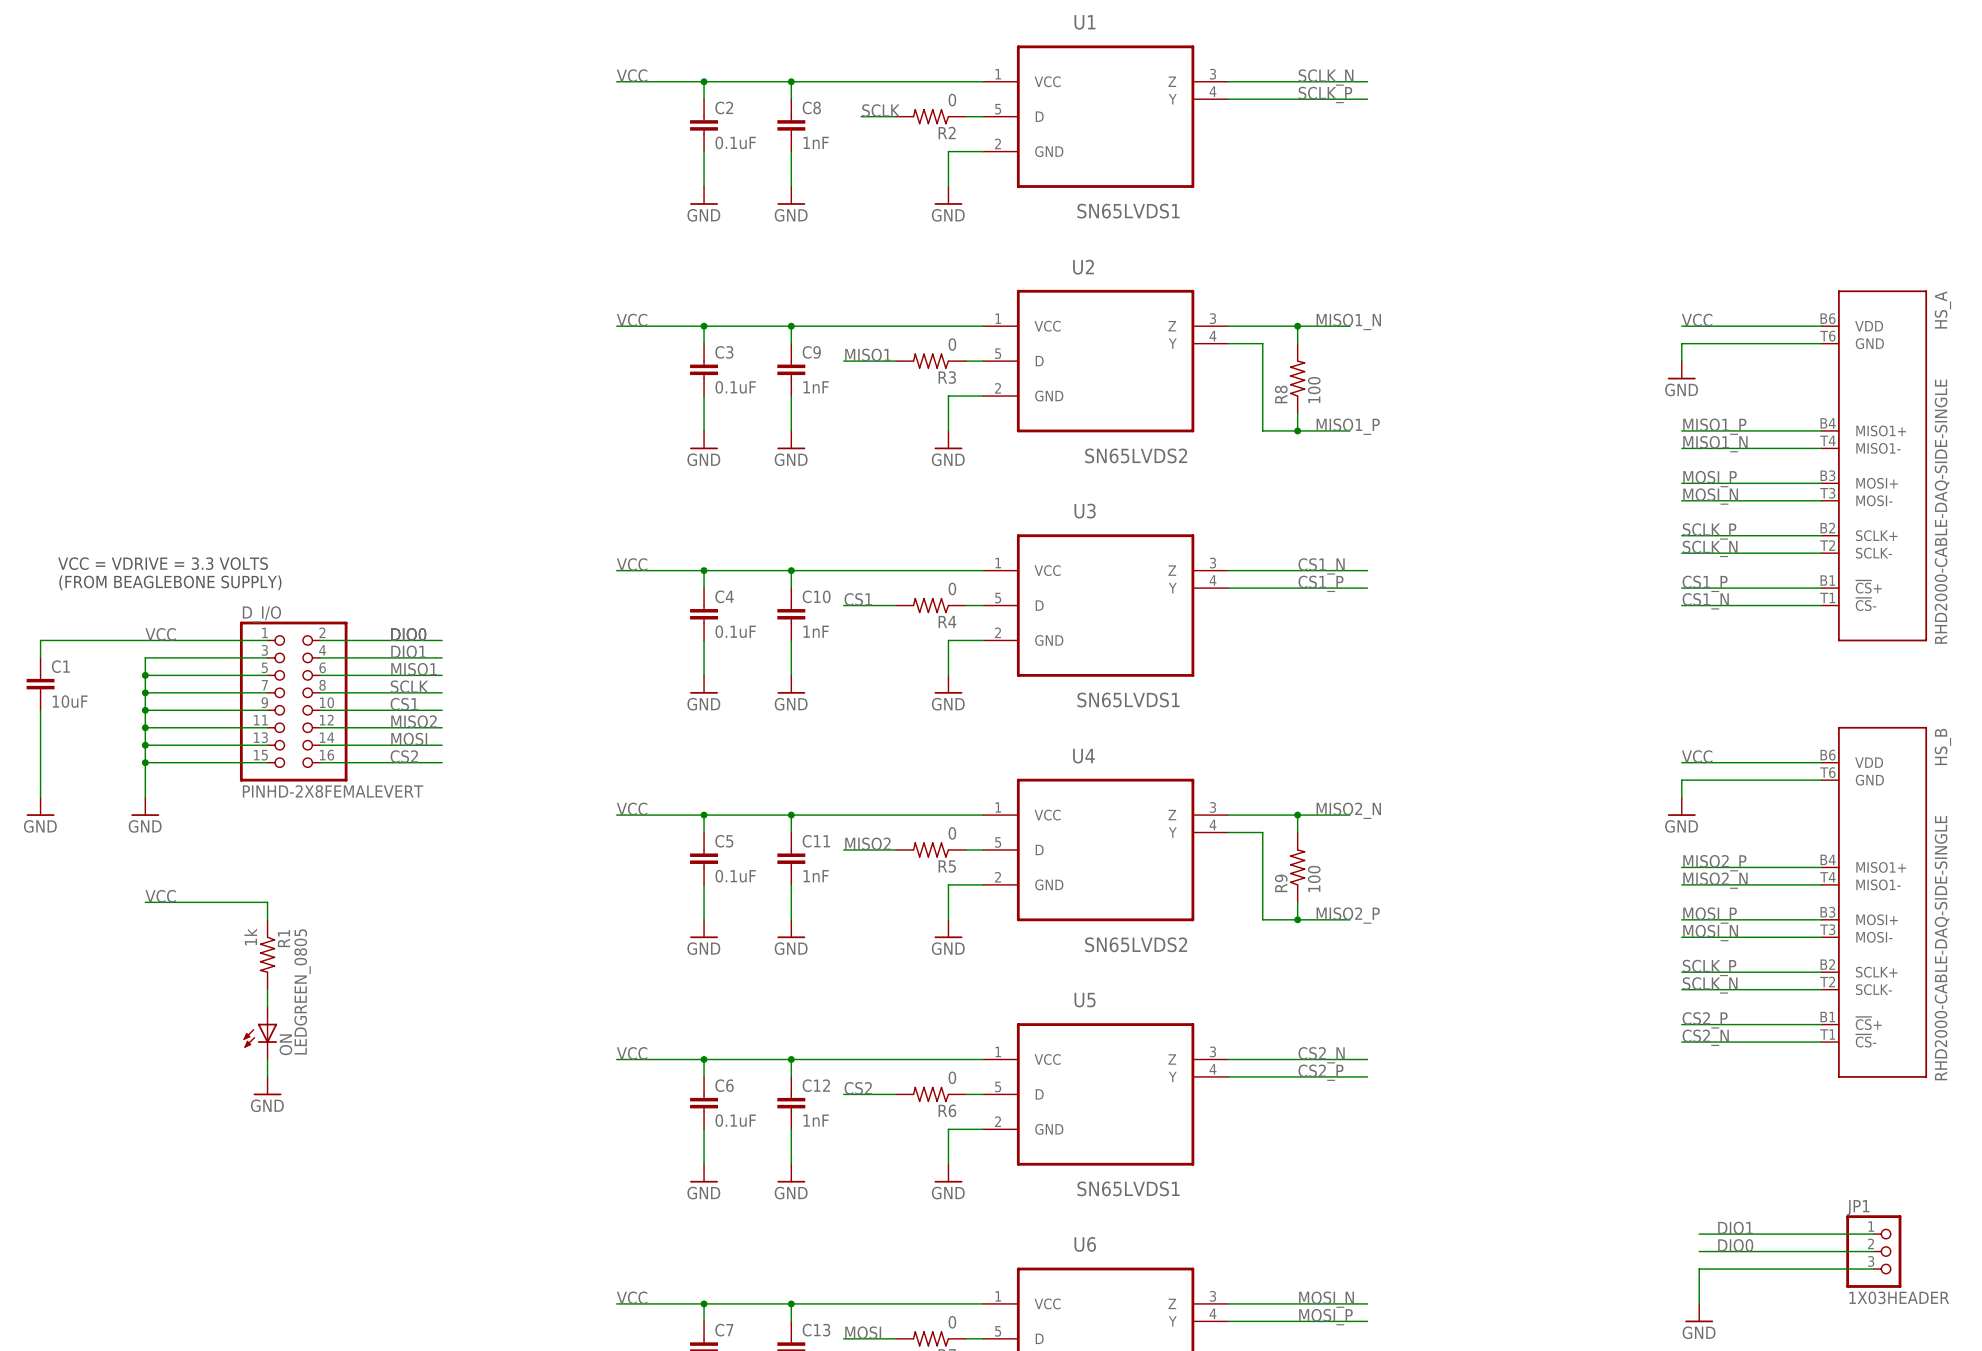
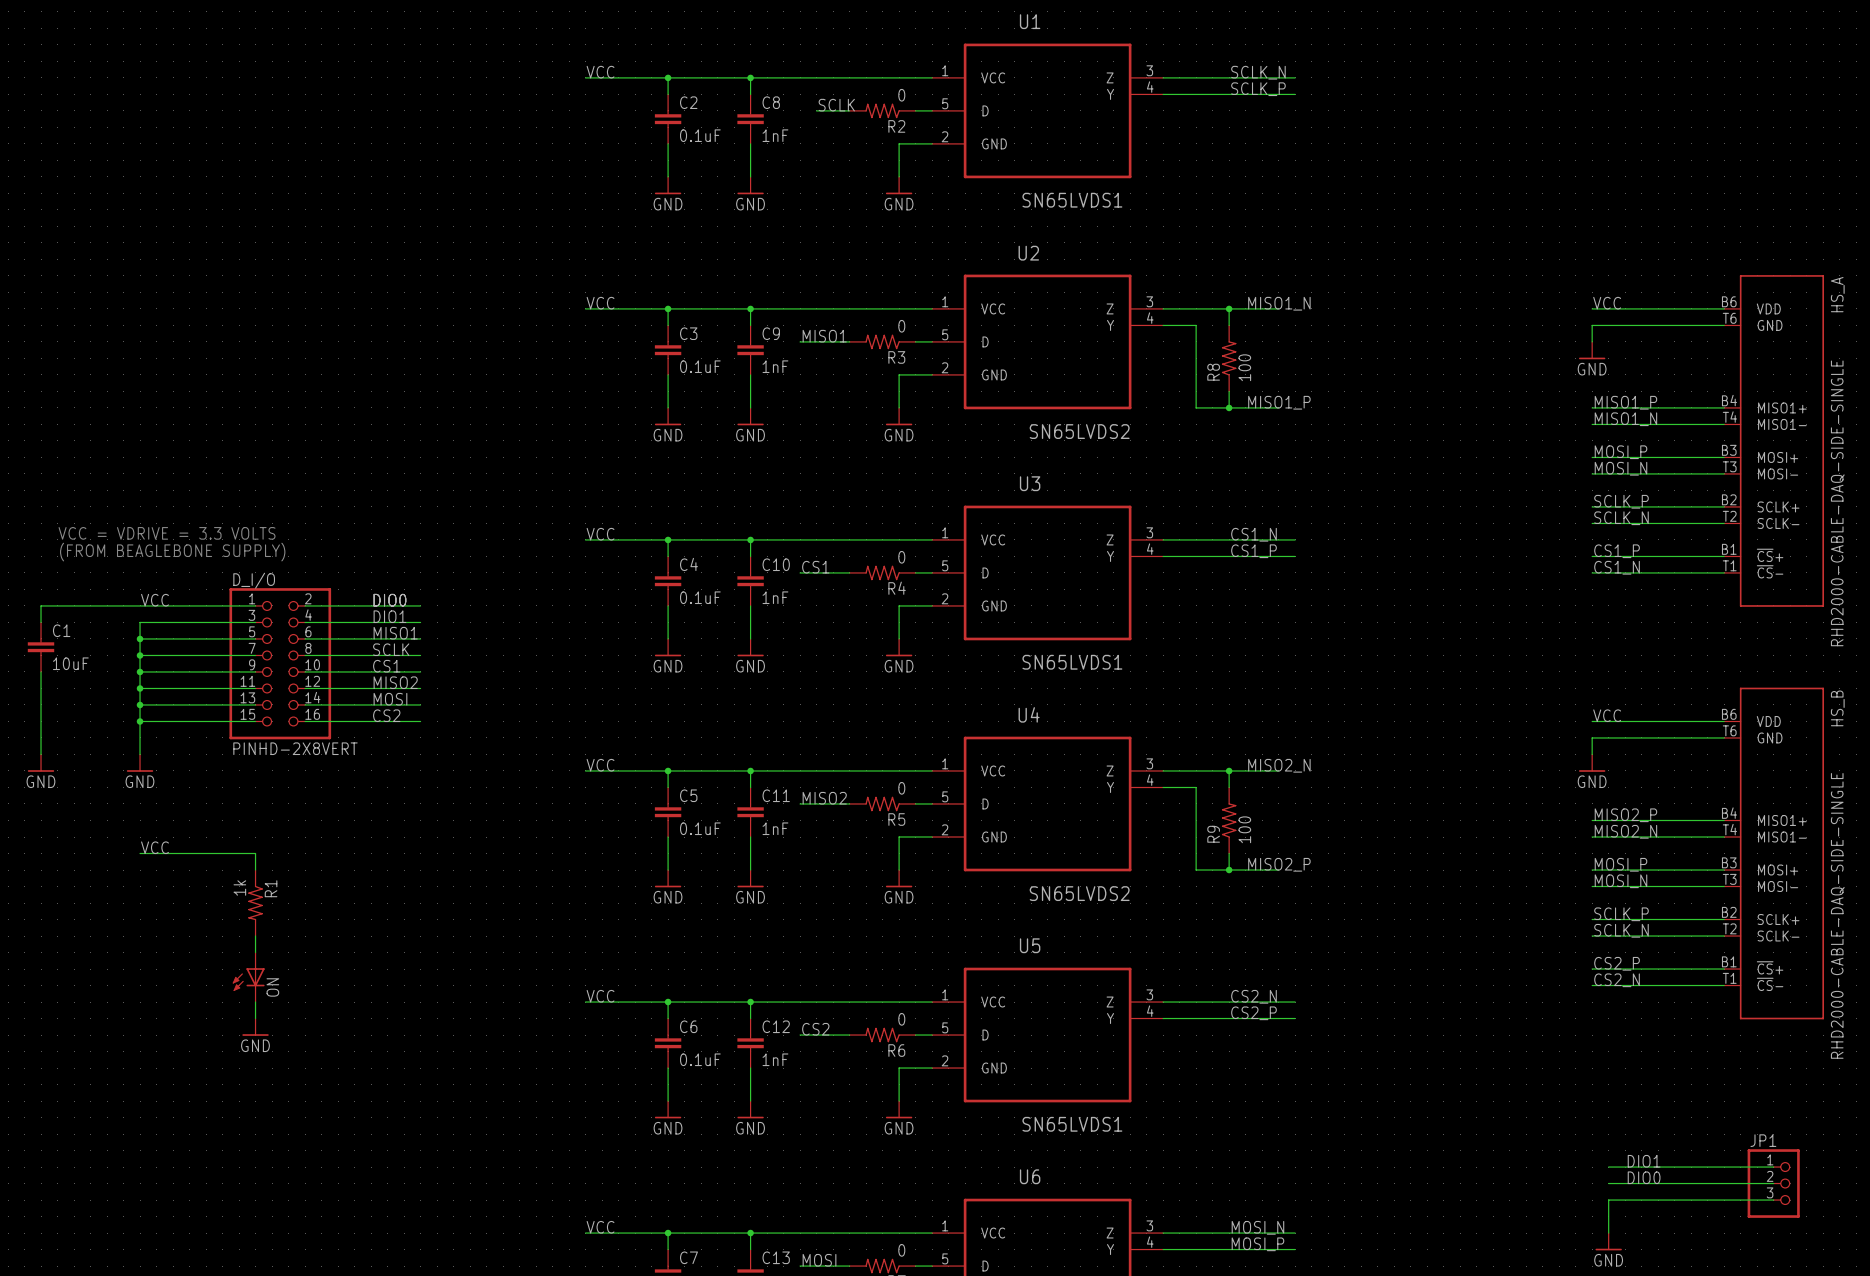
D_I/O value: PINHD-2X8FEMALEVERT (333, 791) -> PINHD-2X8VERT (295, 748)
ON value: LEDGREEN_0805 (302, 991) -> none
JP1 value: 1X03HEADER (1899, 1297) -> none

